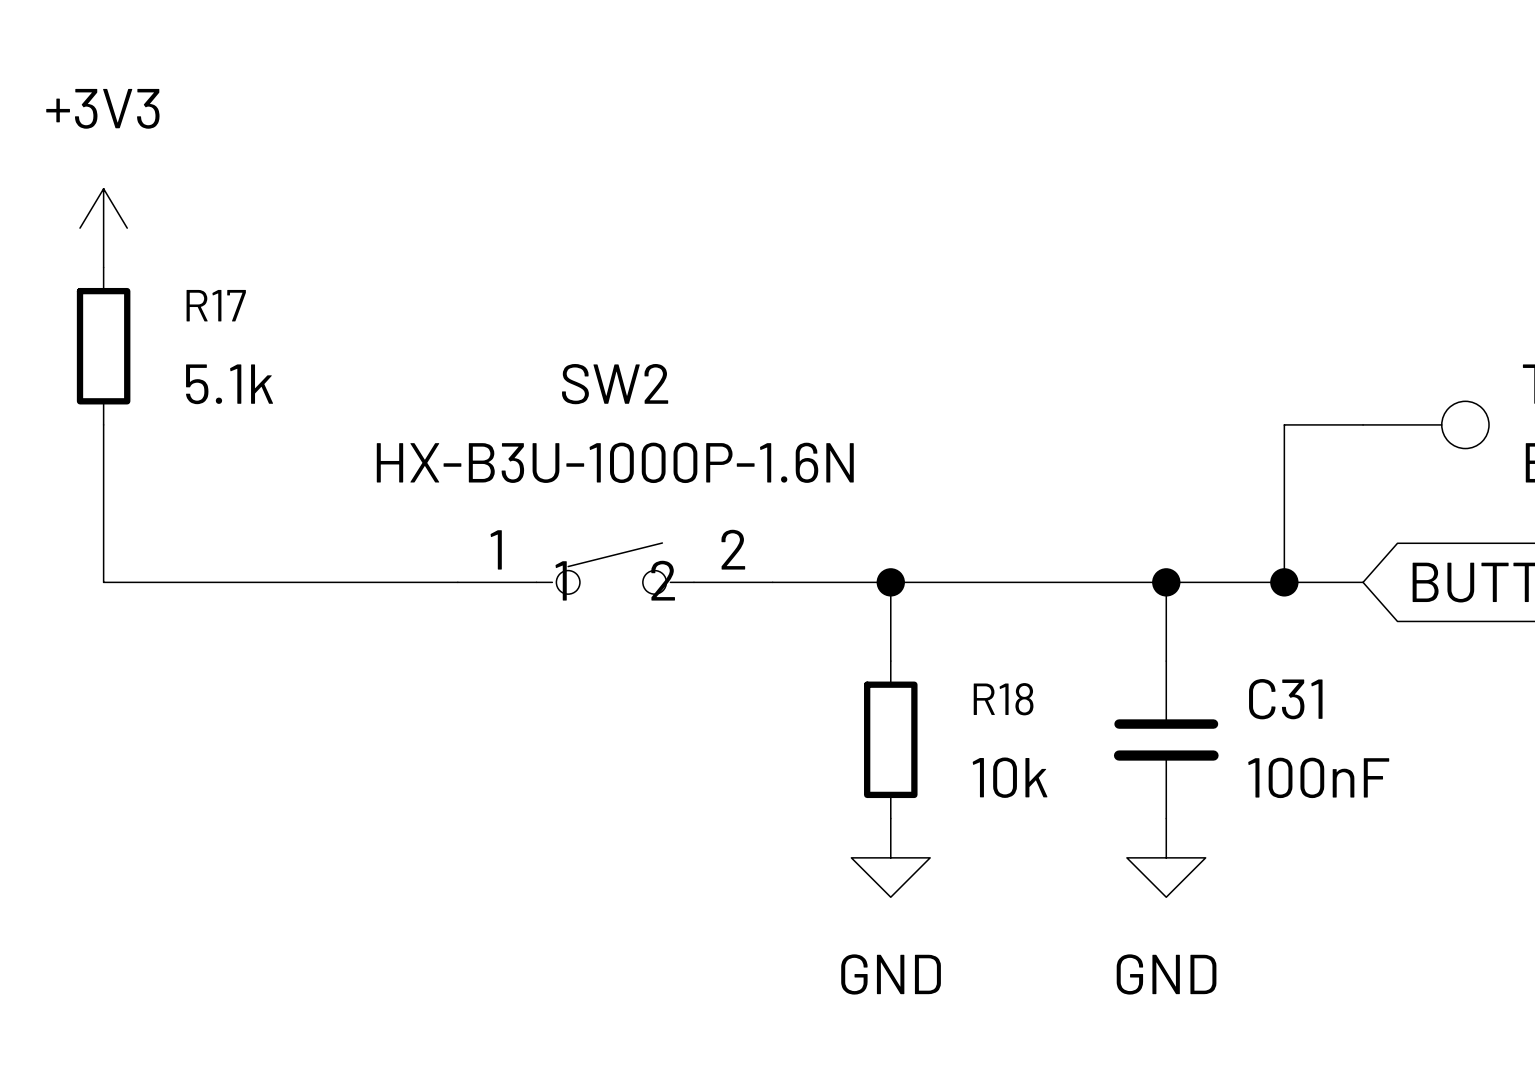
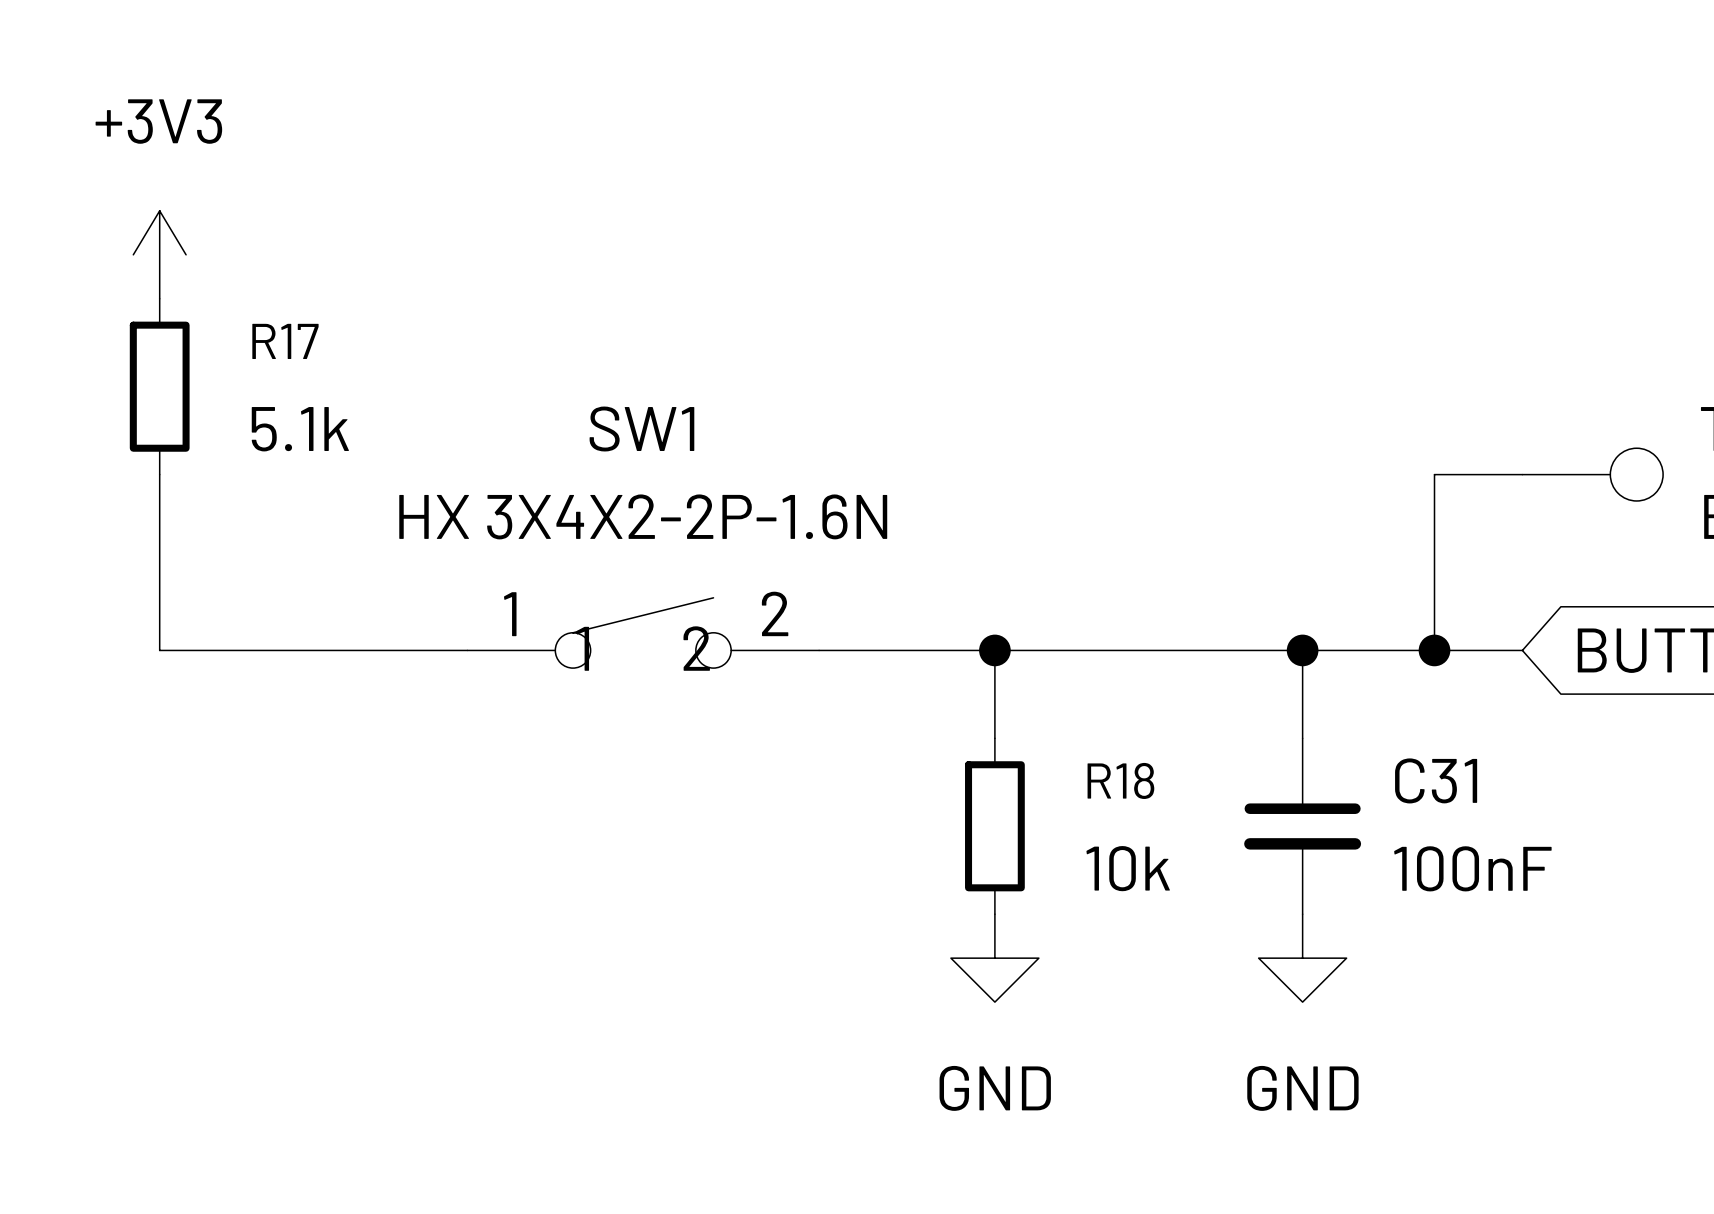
power symbol position: +3V3 (103, 228) -> +3V3 (159, 254)
R17 position: (103, 346) -> (159, 386)
wire: (103, 424) (103, 582) (142, 582) -> (159, 474) (159, 650)
SW1: none -> HX 3X4X2-2P-1.6N (643, 632)
SW2: HX-B3U-1000P-1.6N (615, 568) -> none

